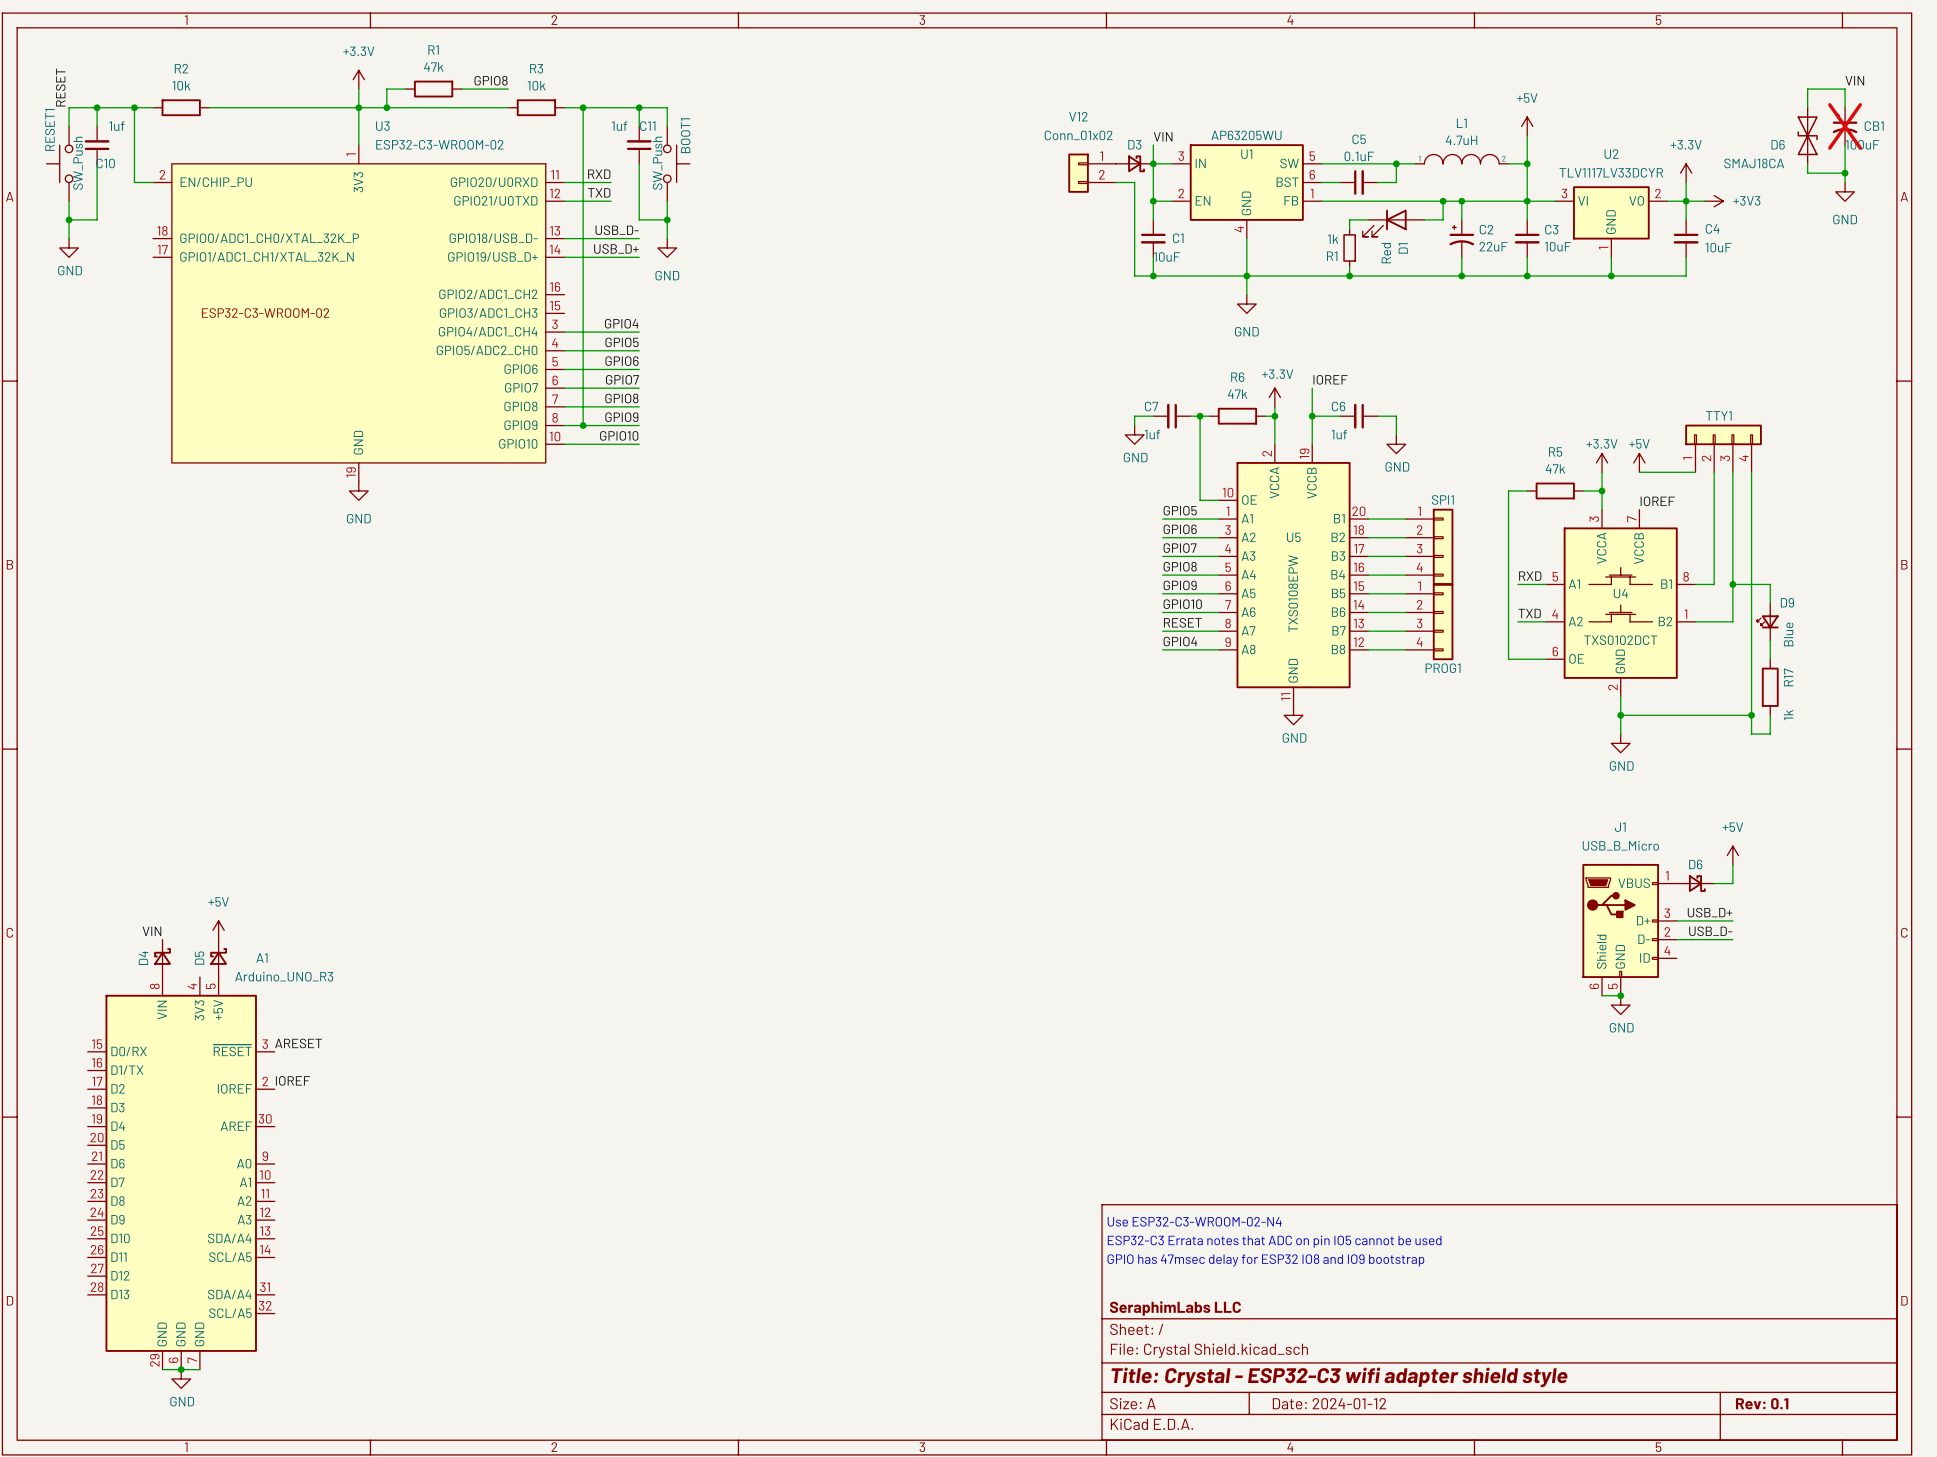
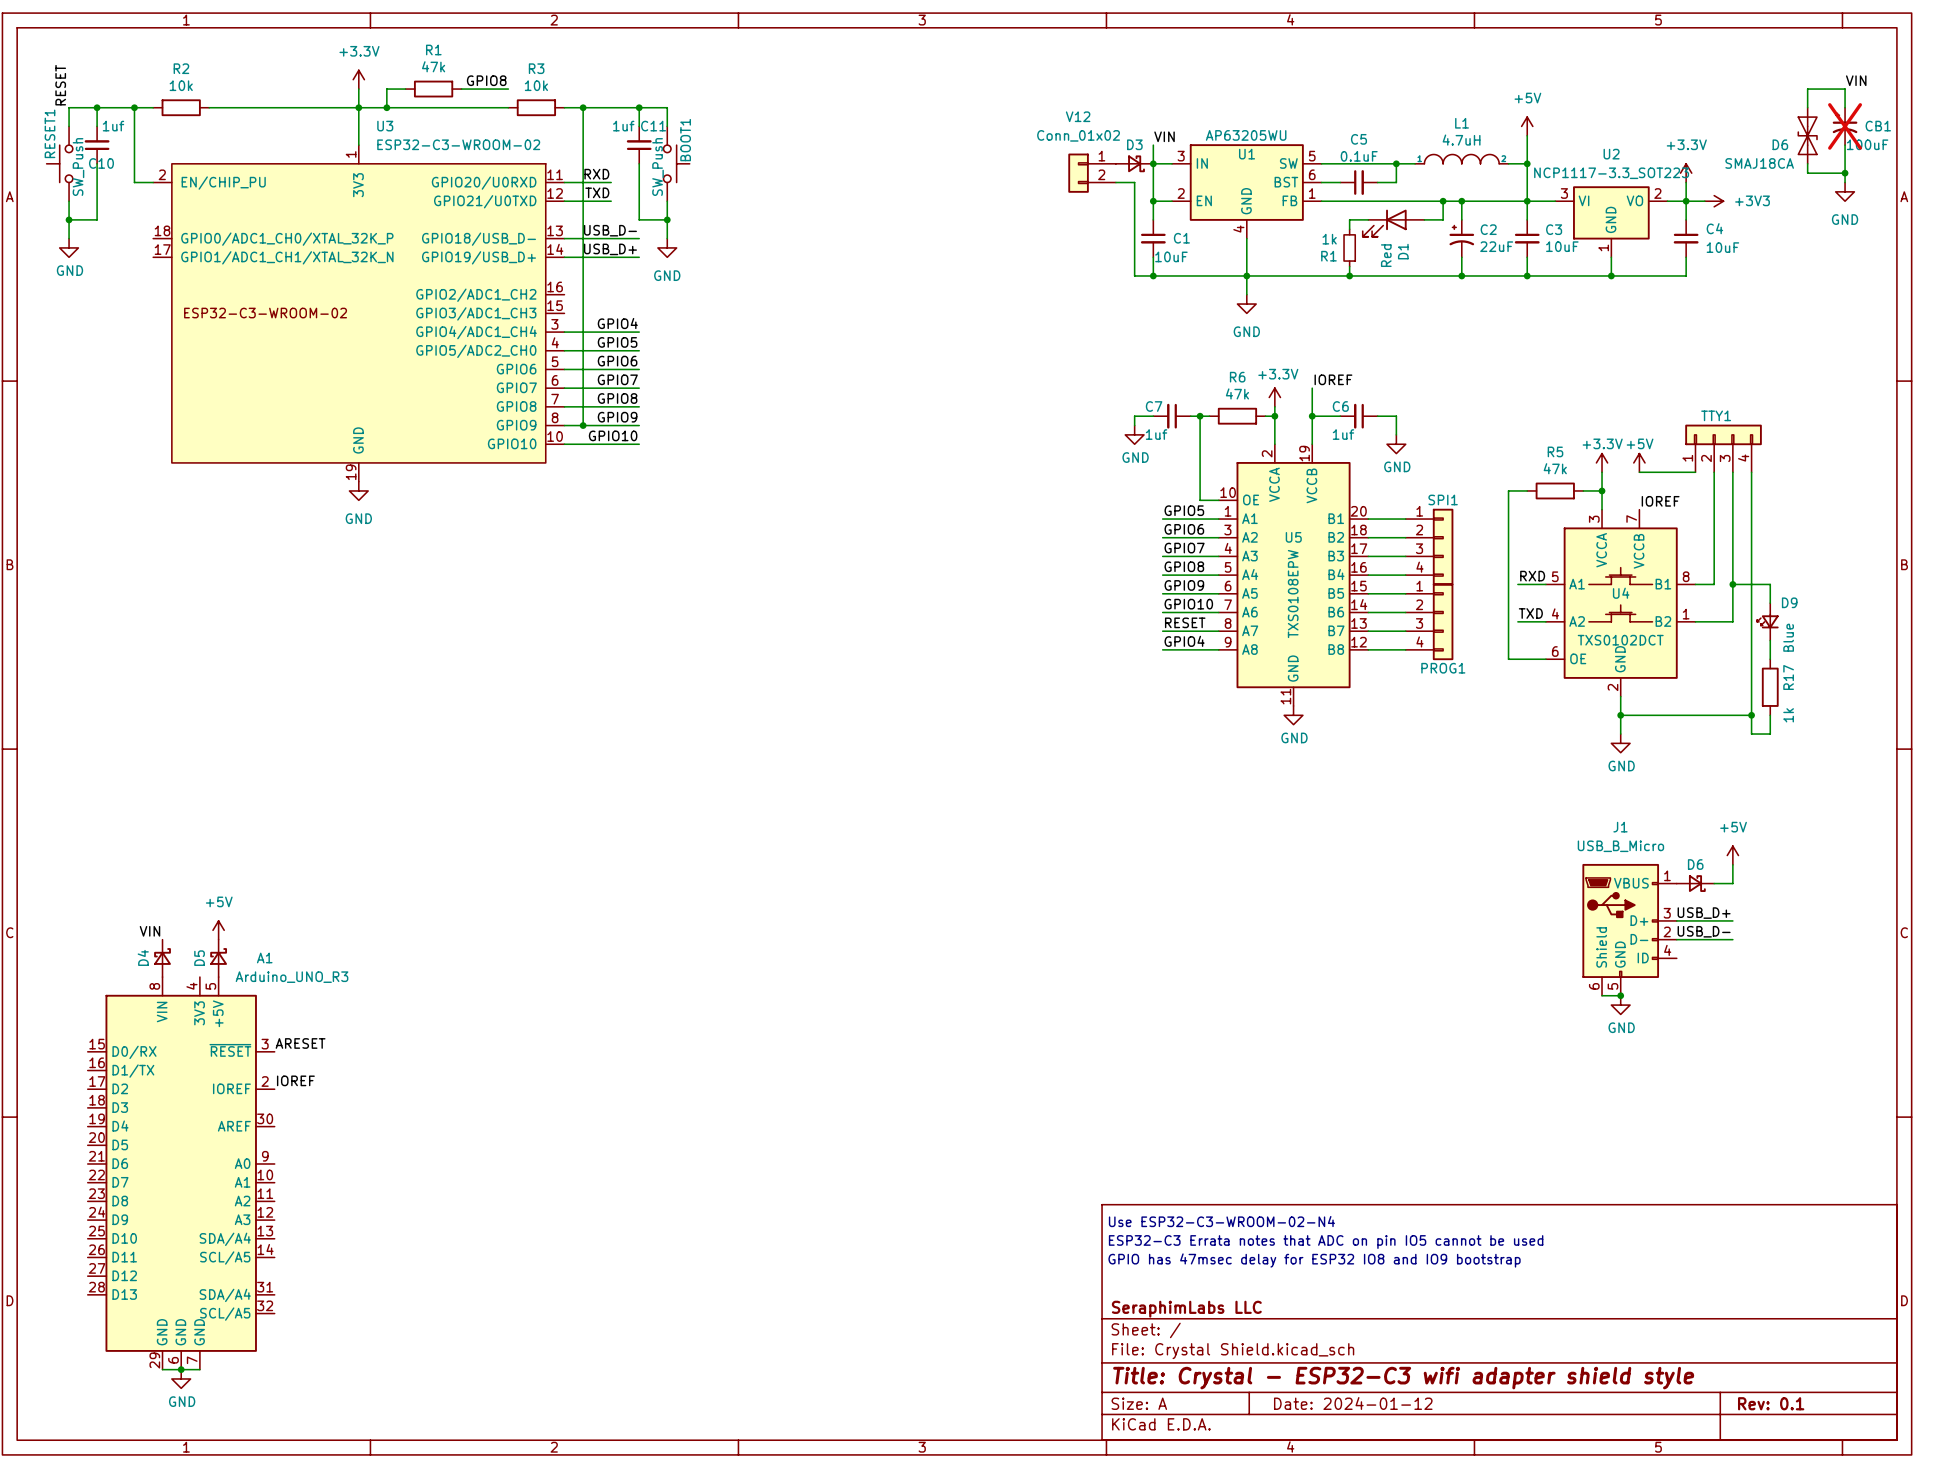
U2 value: TLV1117LV33DCYR (1611, 172) -> NCP1117-3.3_SOT223 (1611, 173)

